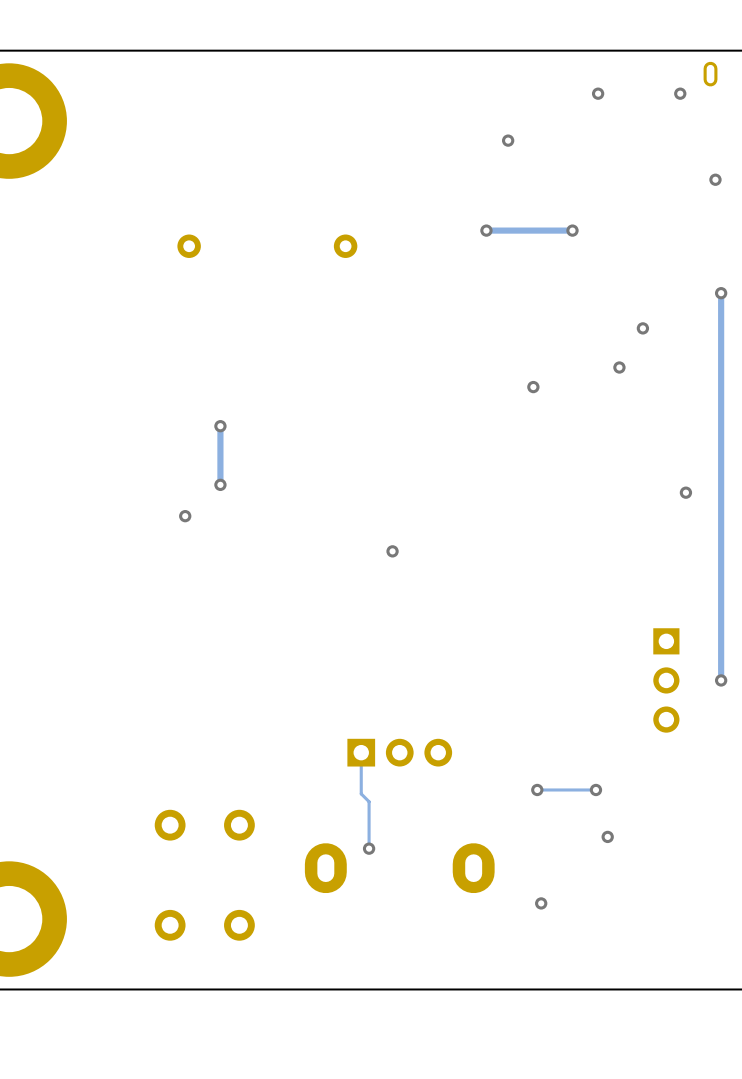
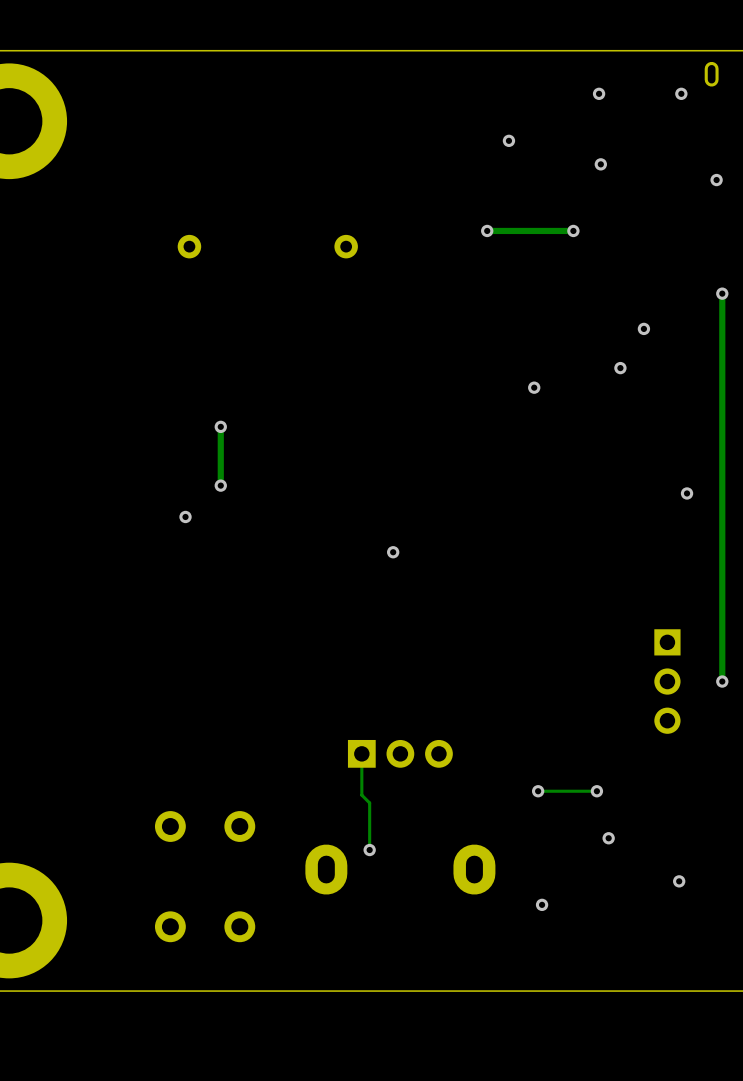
via: none -> (600, 164)
via: none -> (679, 881)

